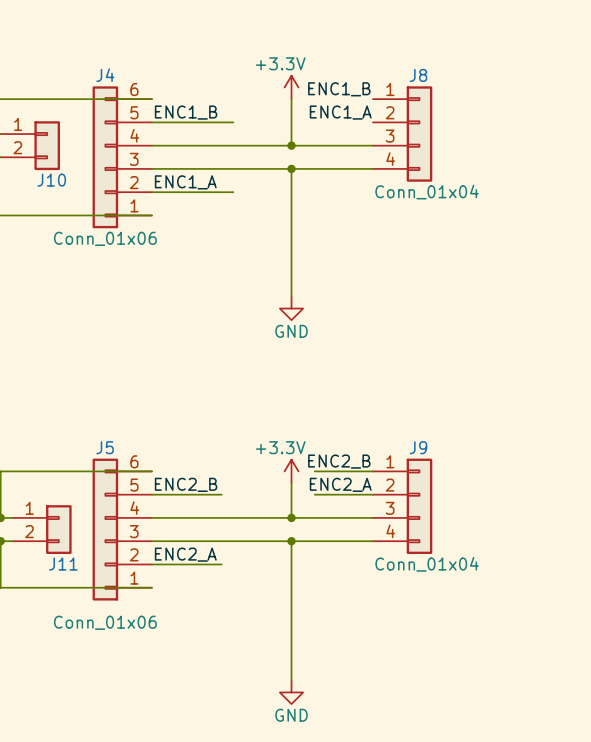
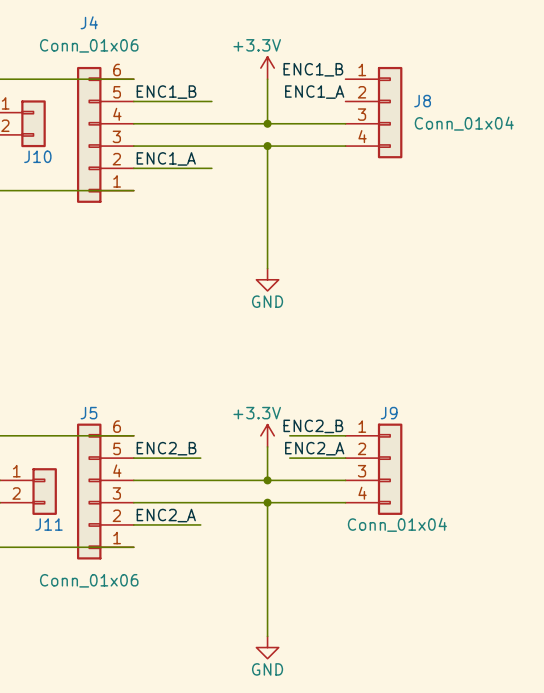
J4 name position: J4 (105, 75) -> J4 (89, 22)
J8 name position: J8 (418, 75) -> J8 (422, 101)
J8 value position: Conn_01x04 (427, 192) -> Conn_01x04 (464, 123)
J4 value position: Conn_01x06 (105, 238) -> Conn_01x06 (89, 45)

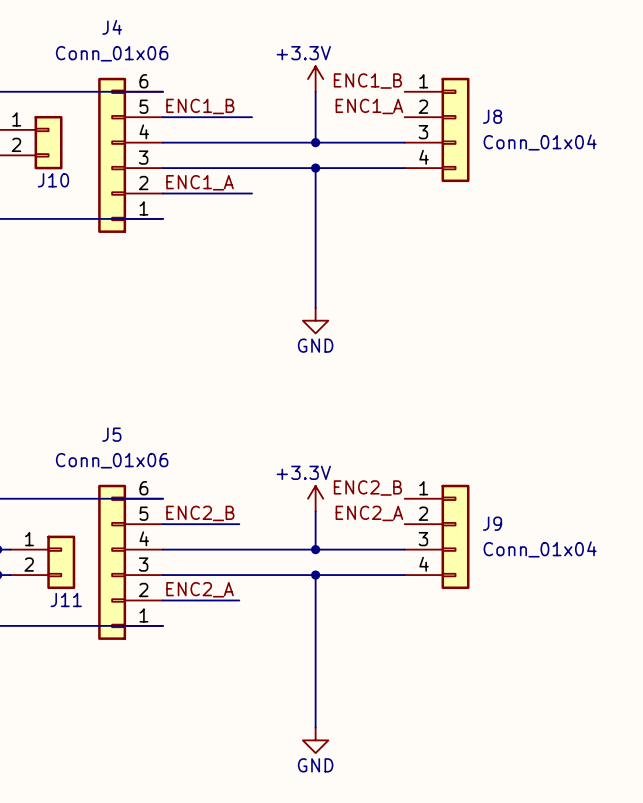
J5 name position: J5 (88, 413) -> J5 (111, 434)
J9 name position: J9 (389, 413) -> J9 (492, 523)
wire: (289, 435) (345, 435) -> none
wire: (289, 458) (345, 458) -> none
J9 value position: Conn_01x04 (397, 524) -> Conn_01x04 (540, 549)
J5 value position: Conn_01x06 (89, 580) -> Conn_01x06 (112, 460)

